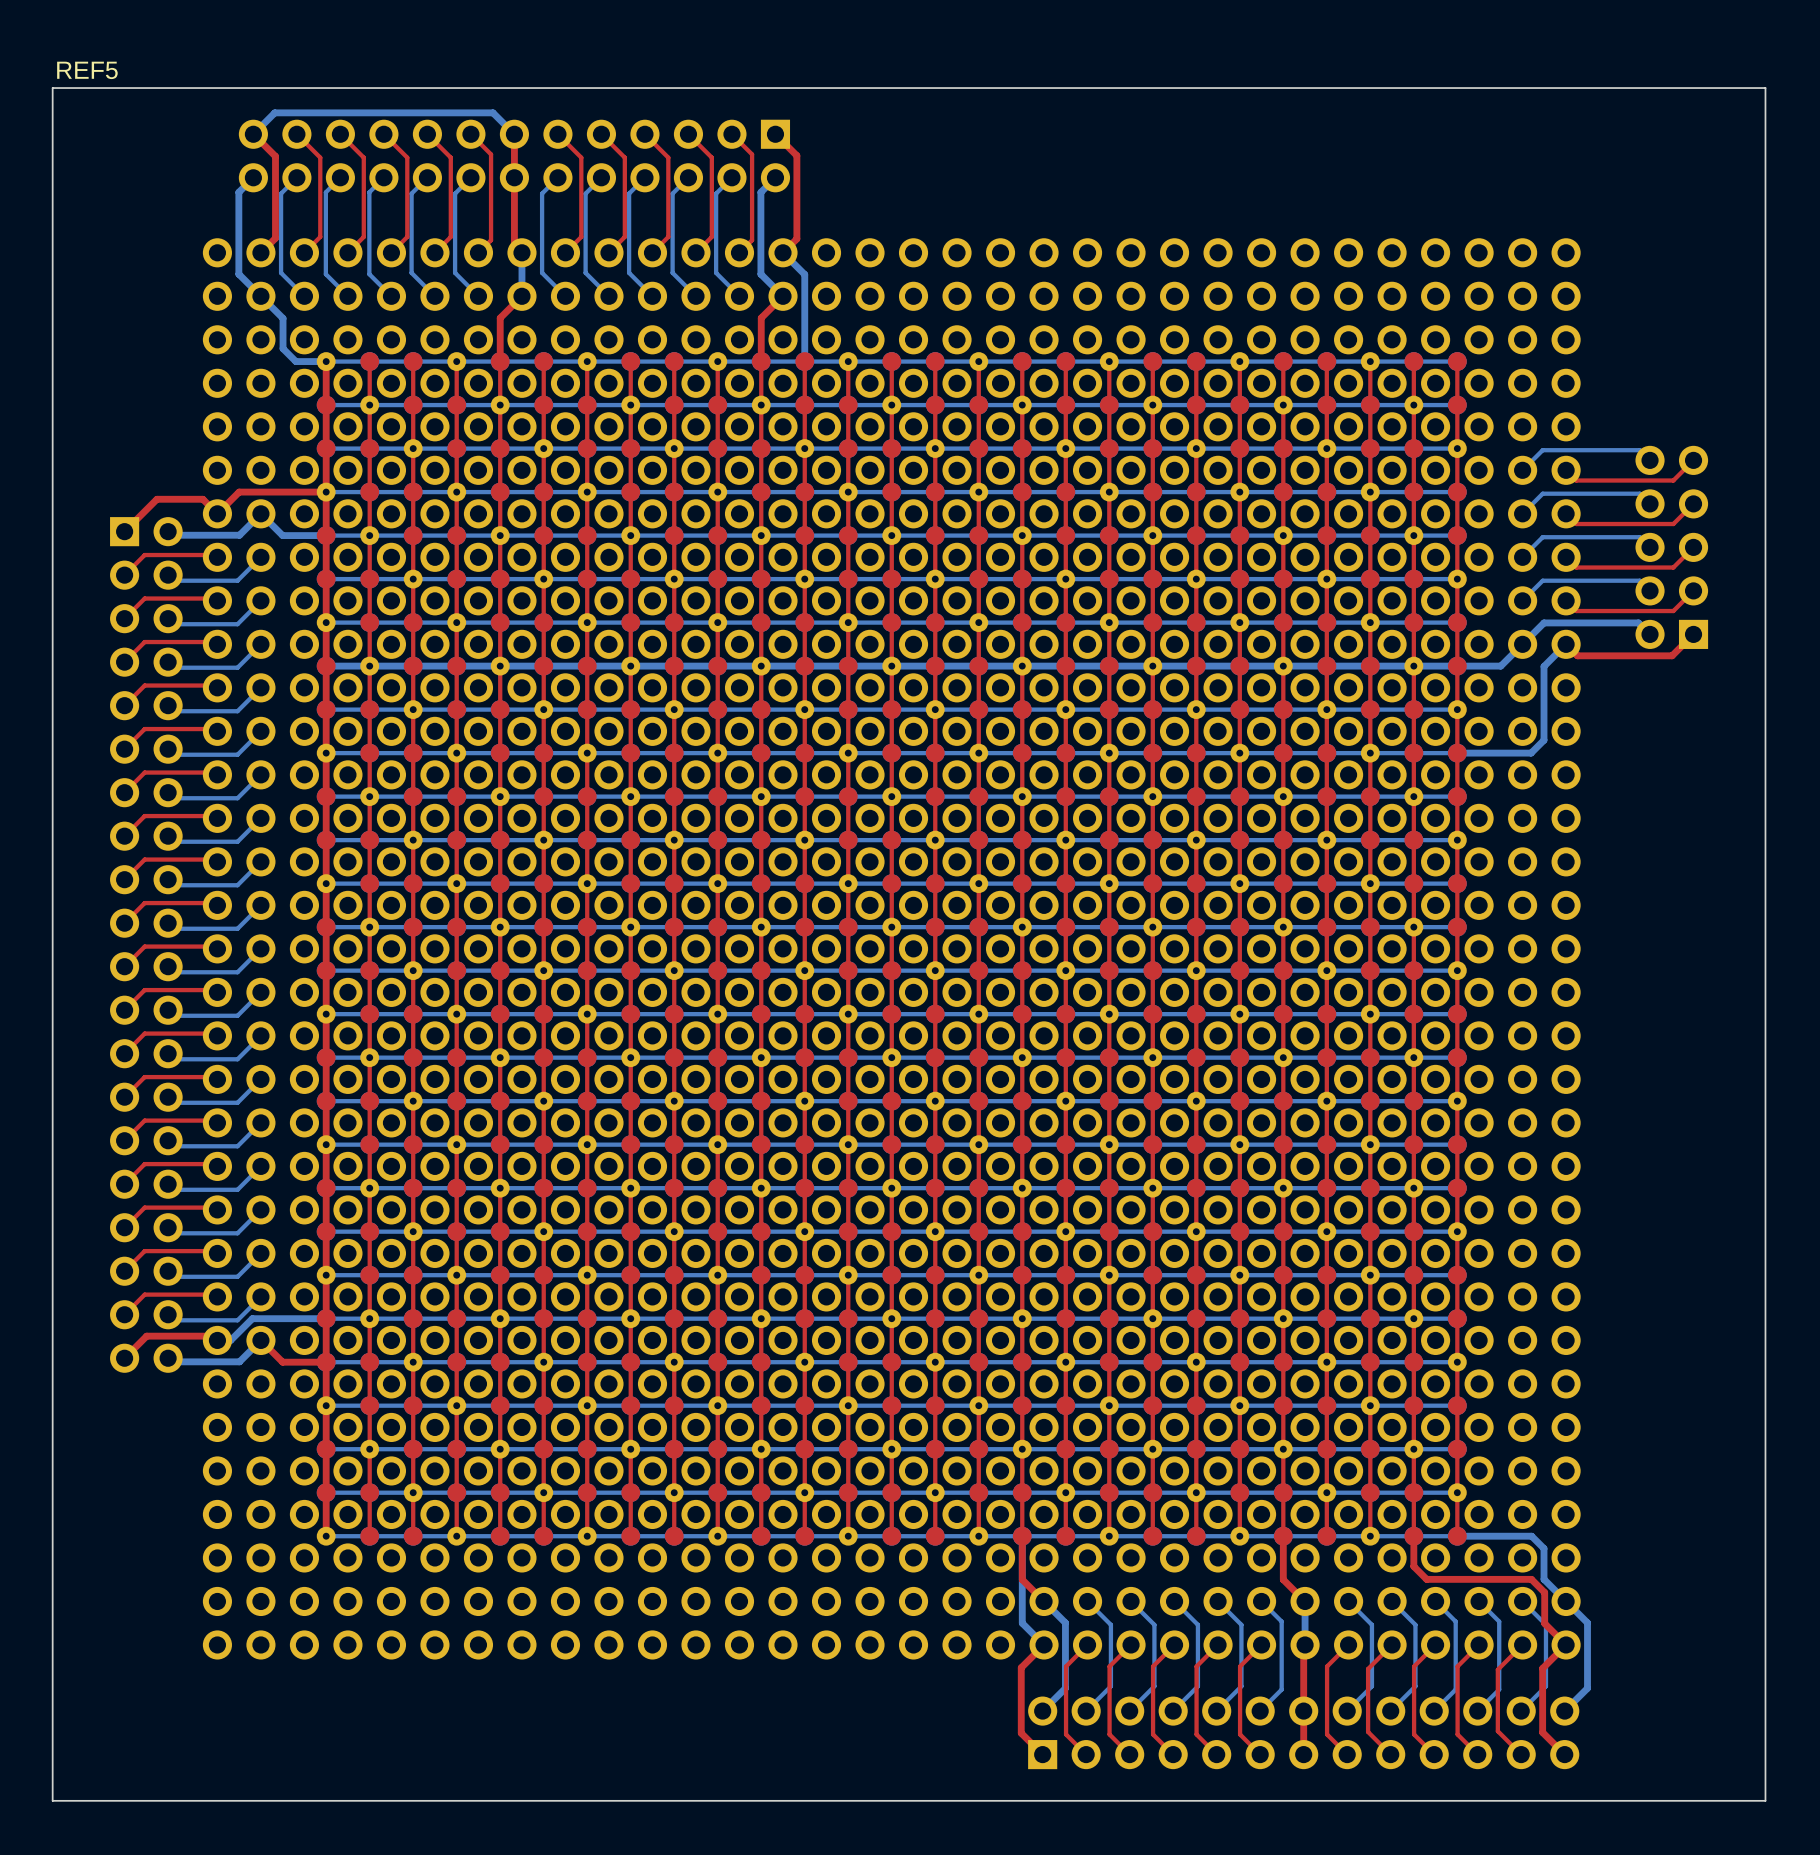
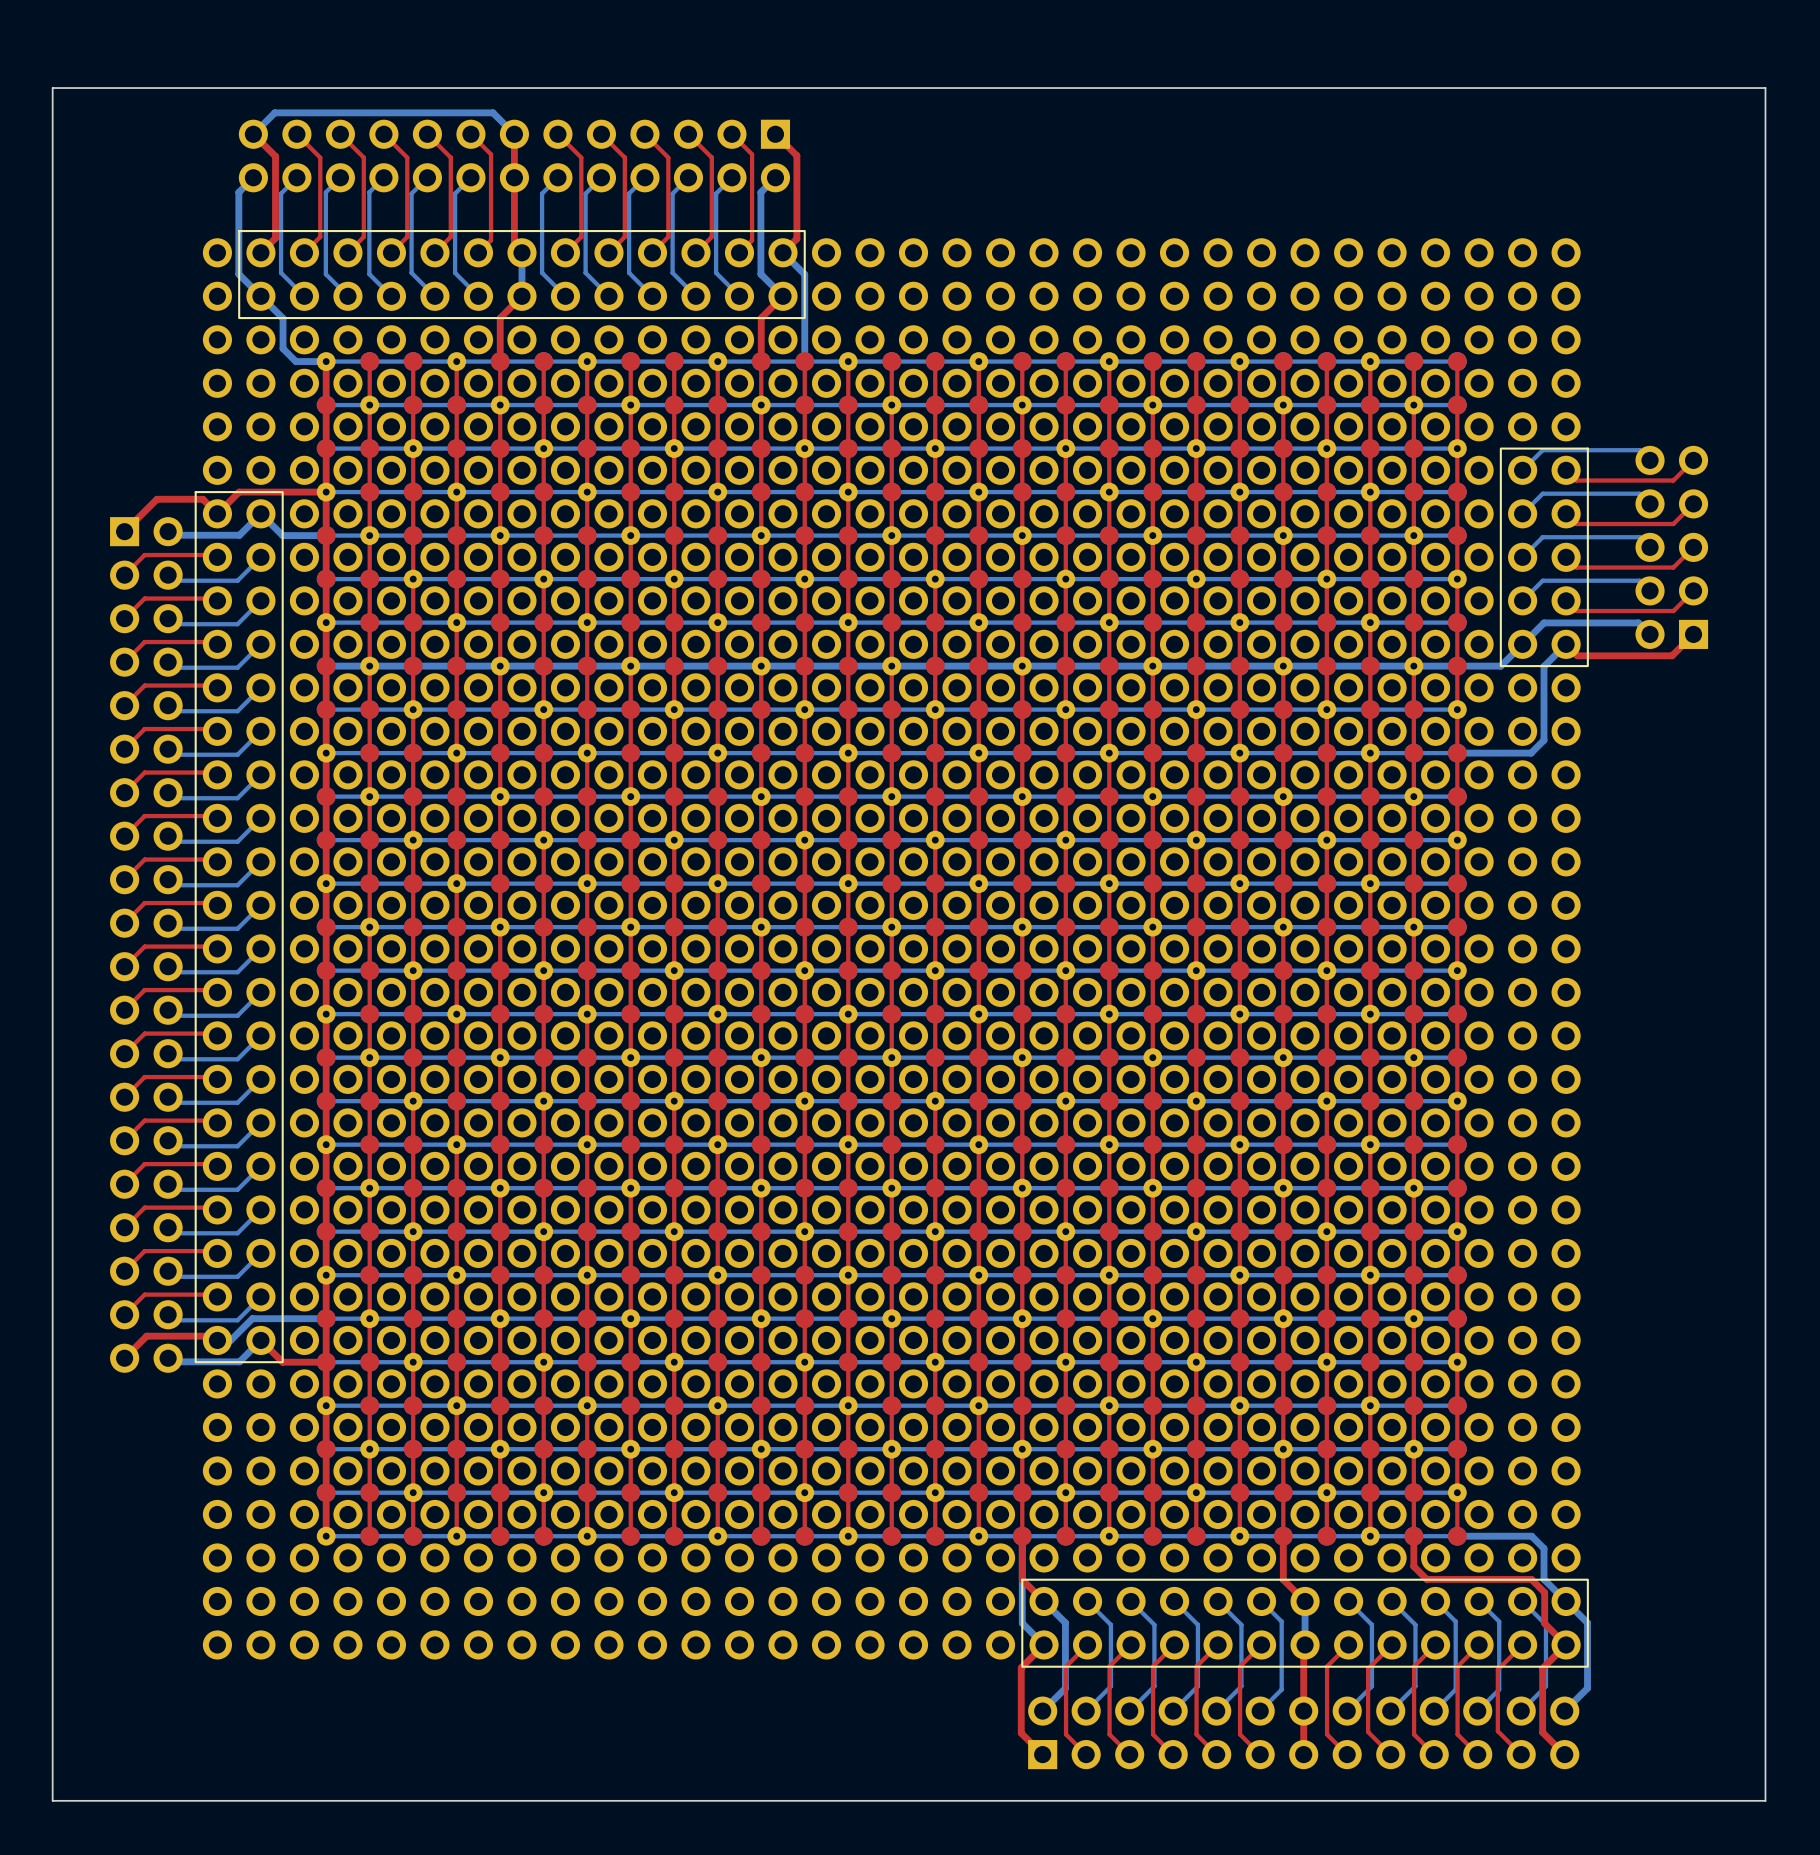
REF5: (891, 948) -> none
part: none -> (891, 948)

